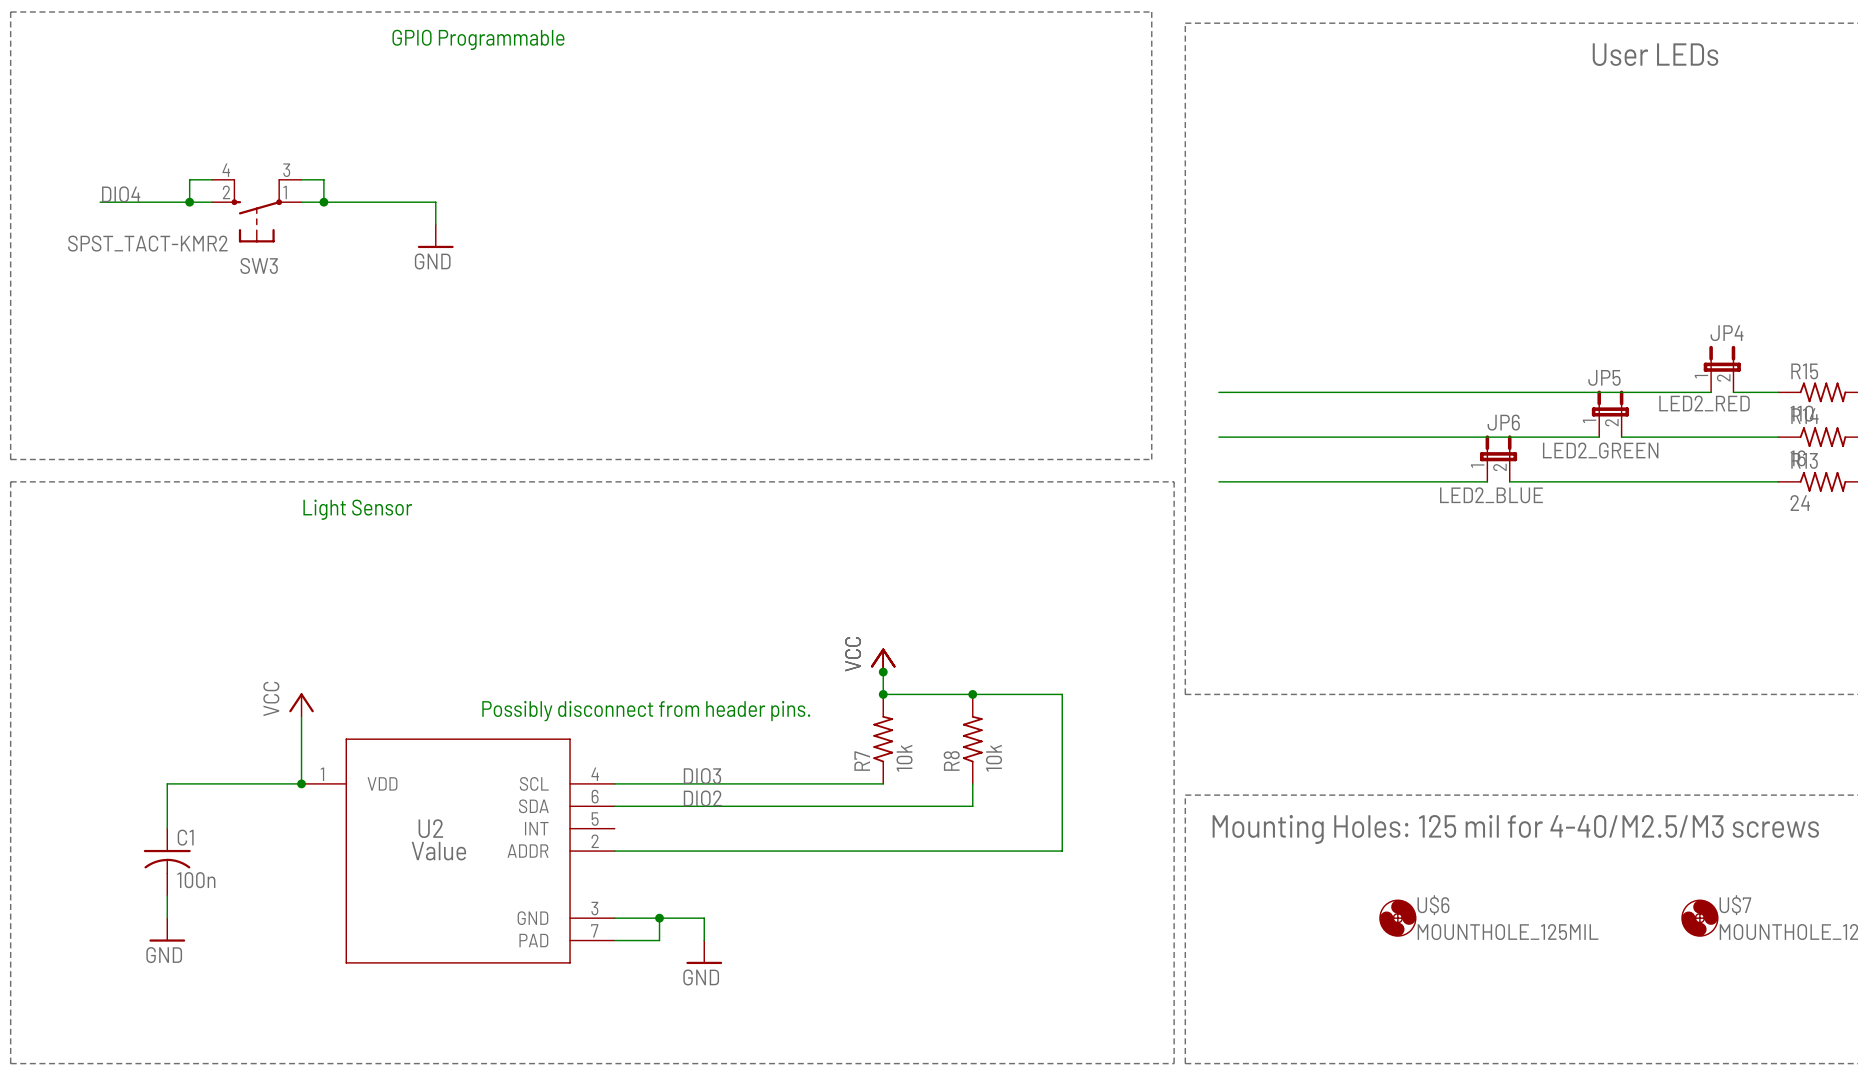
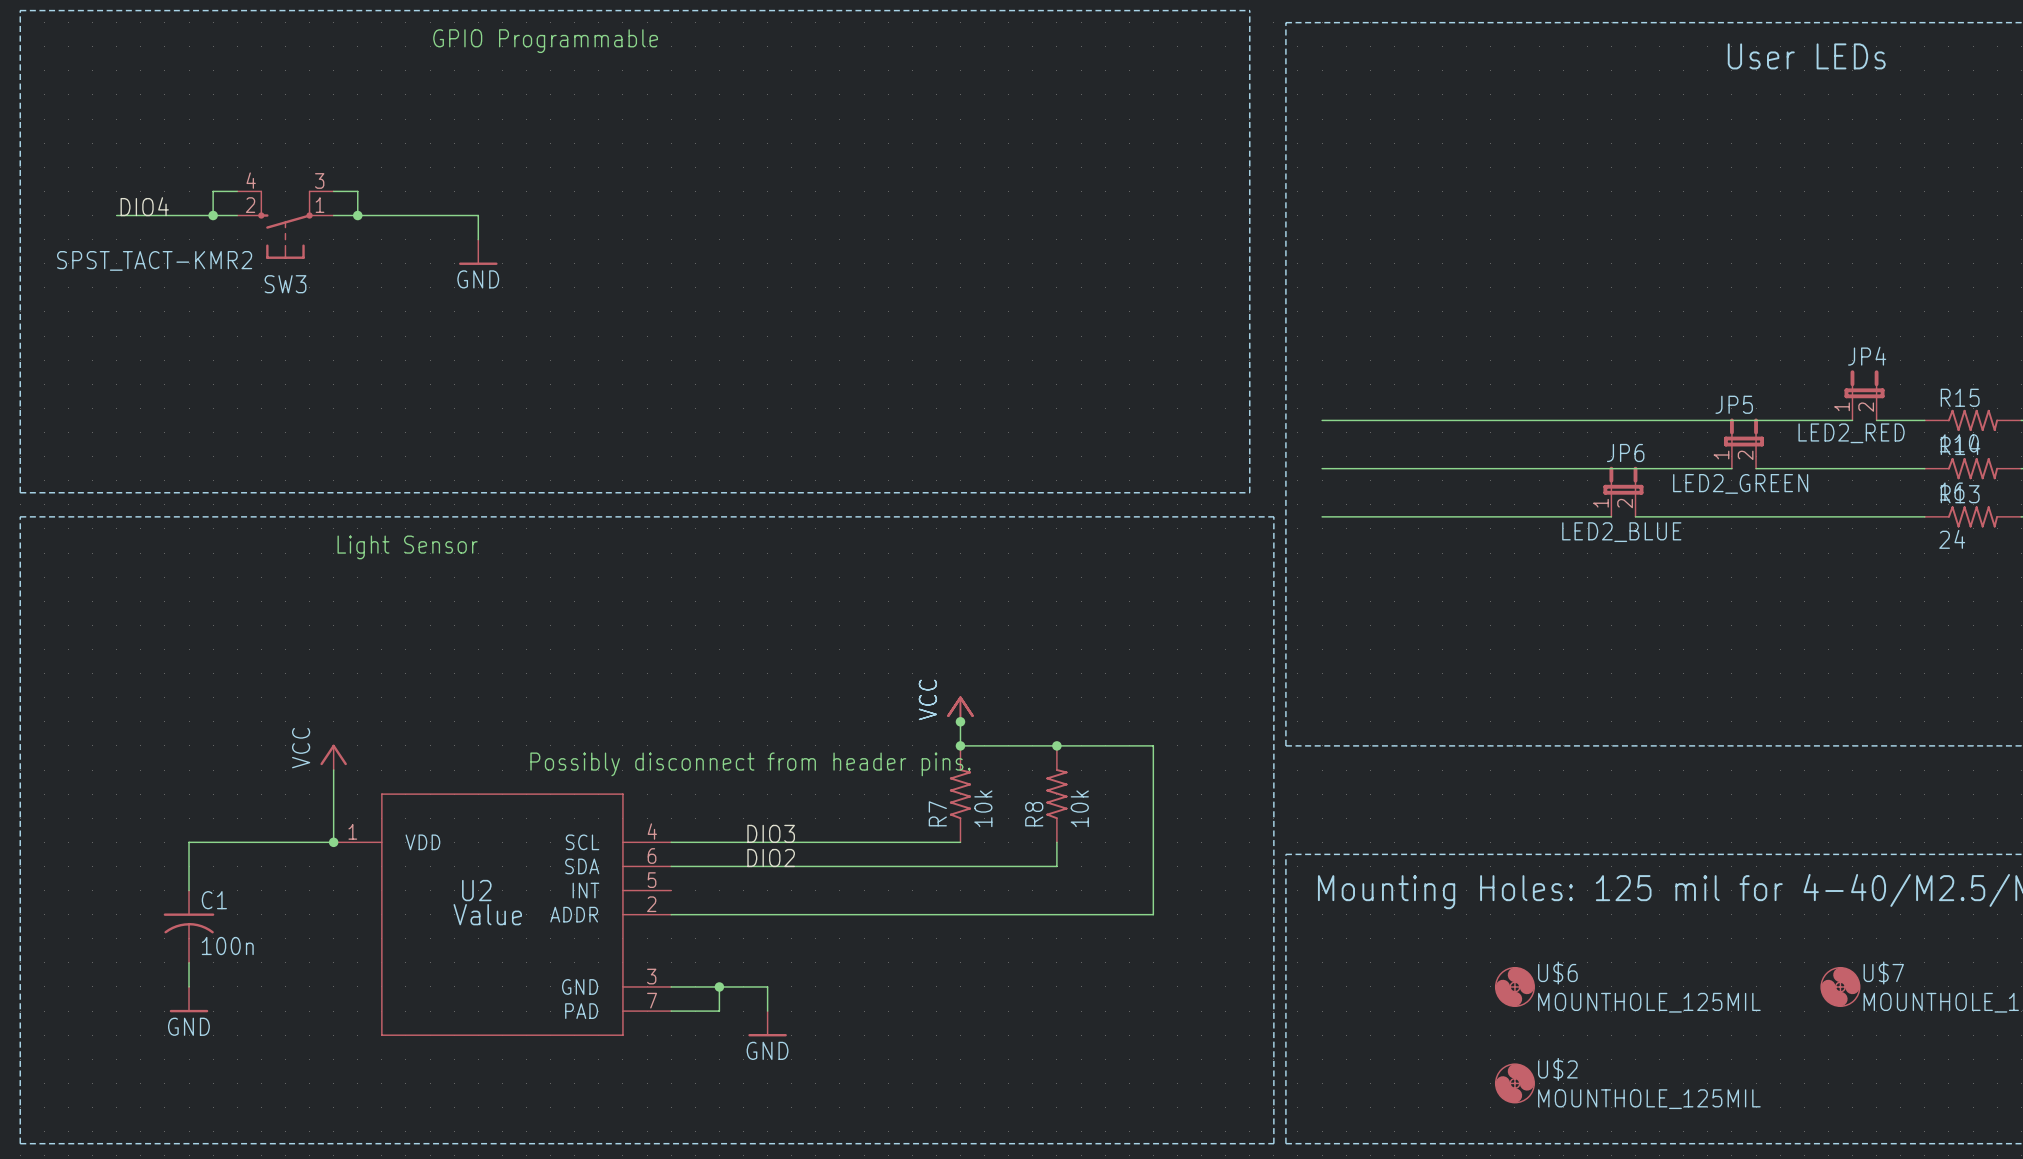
U$2: none -> MOUNTHOLE_125MIL (1514, 1083)

